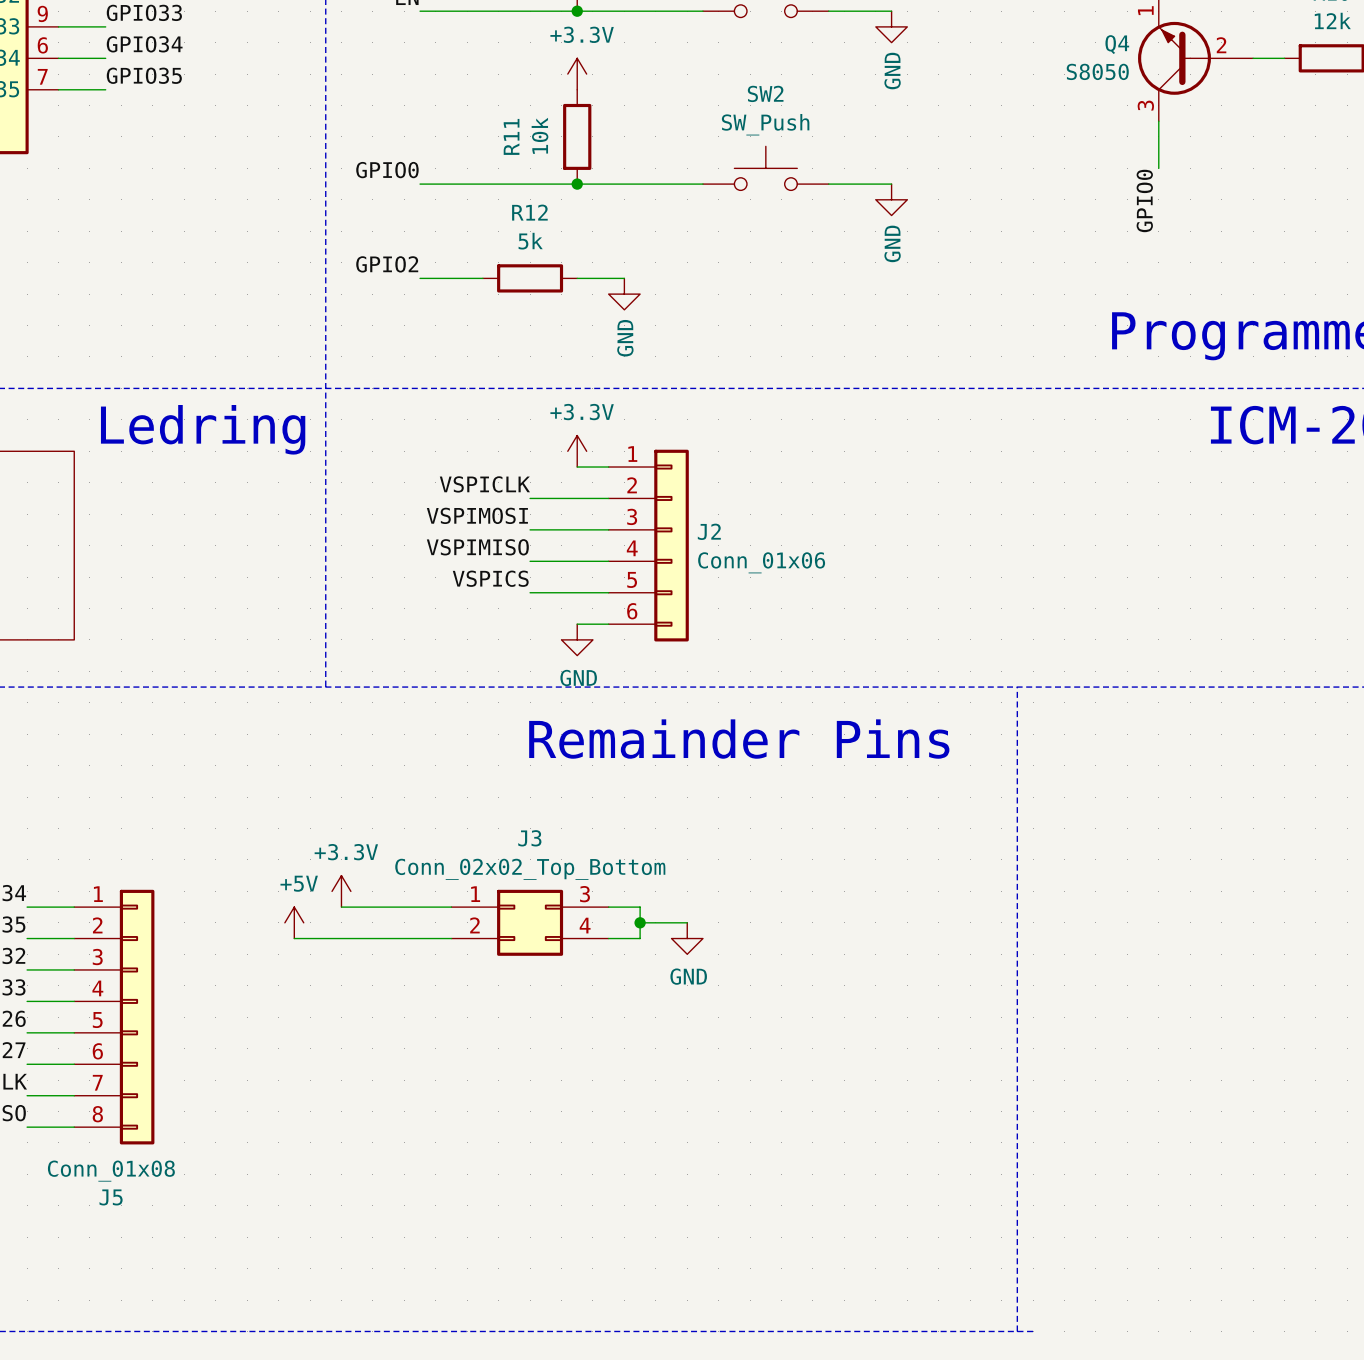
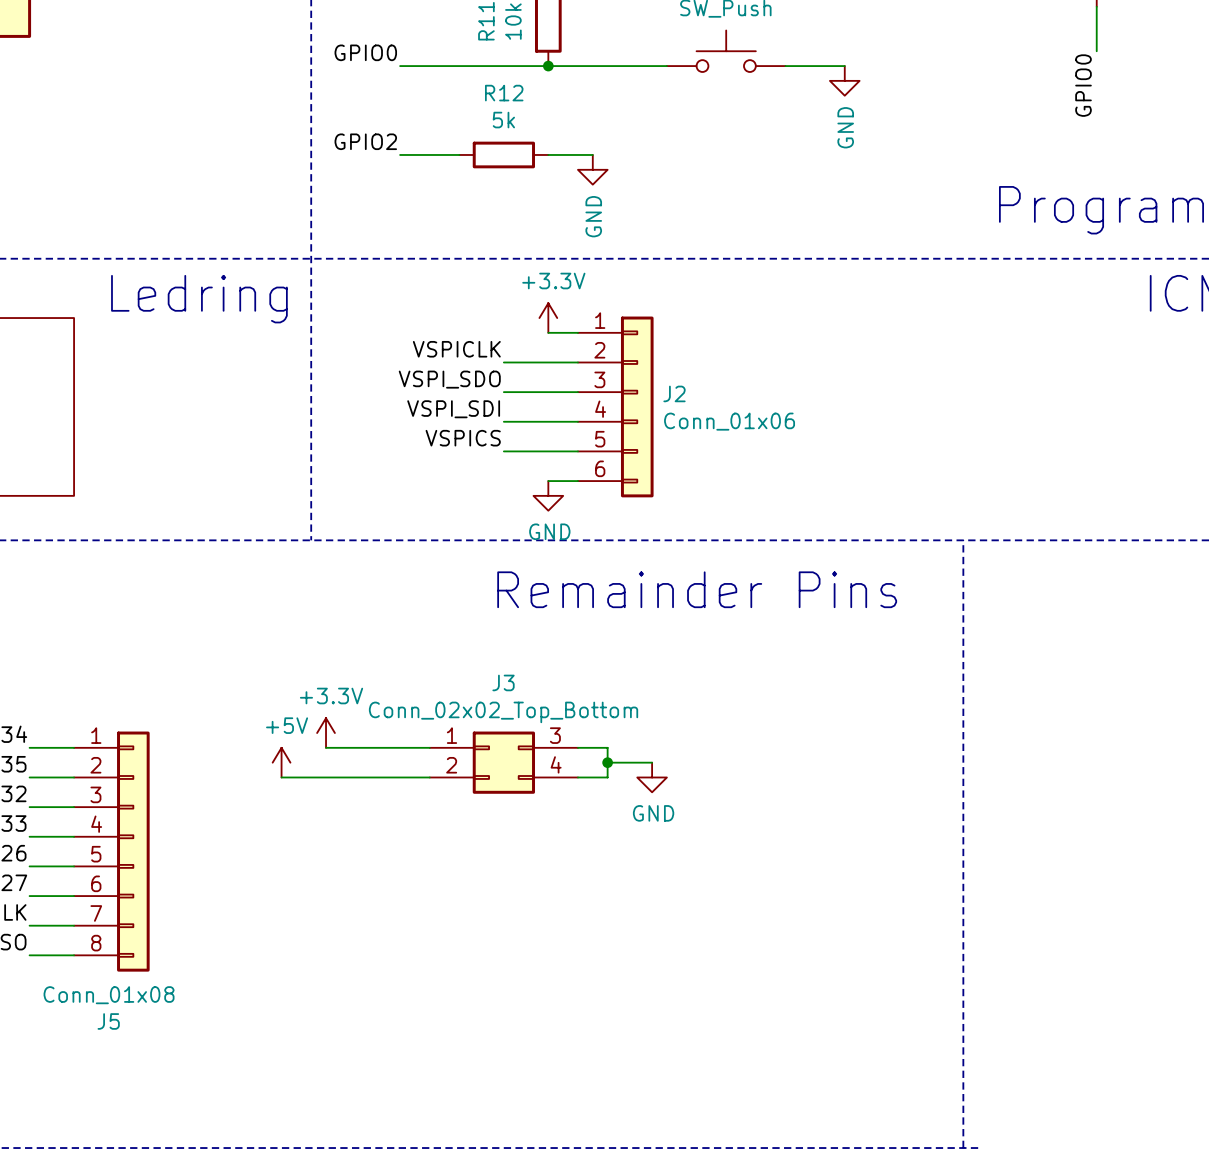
label: VSPIMOSI (477, 515) -> VSPI_SDO (449, 379)
label: VSPIMISO (477, 547) -> VSPI_SDI (453, 409)

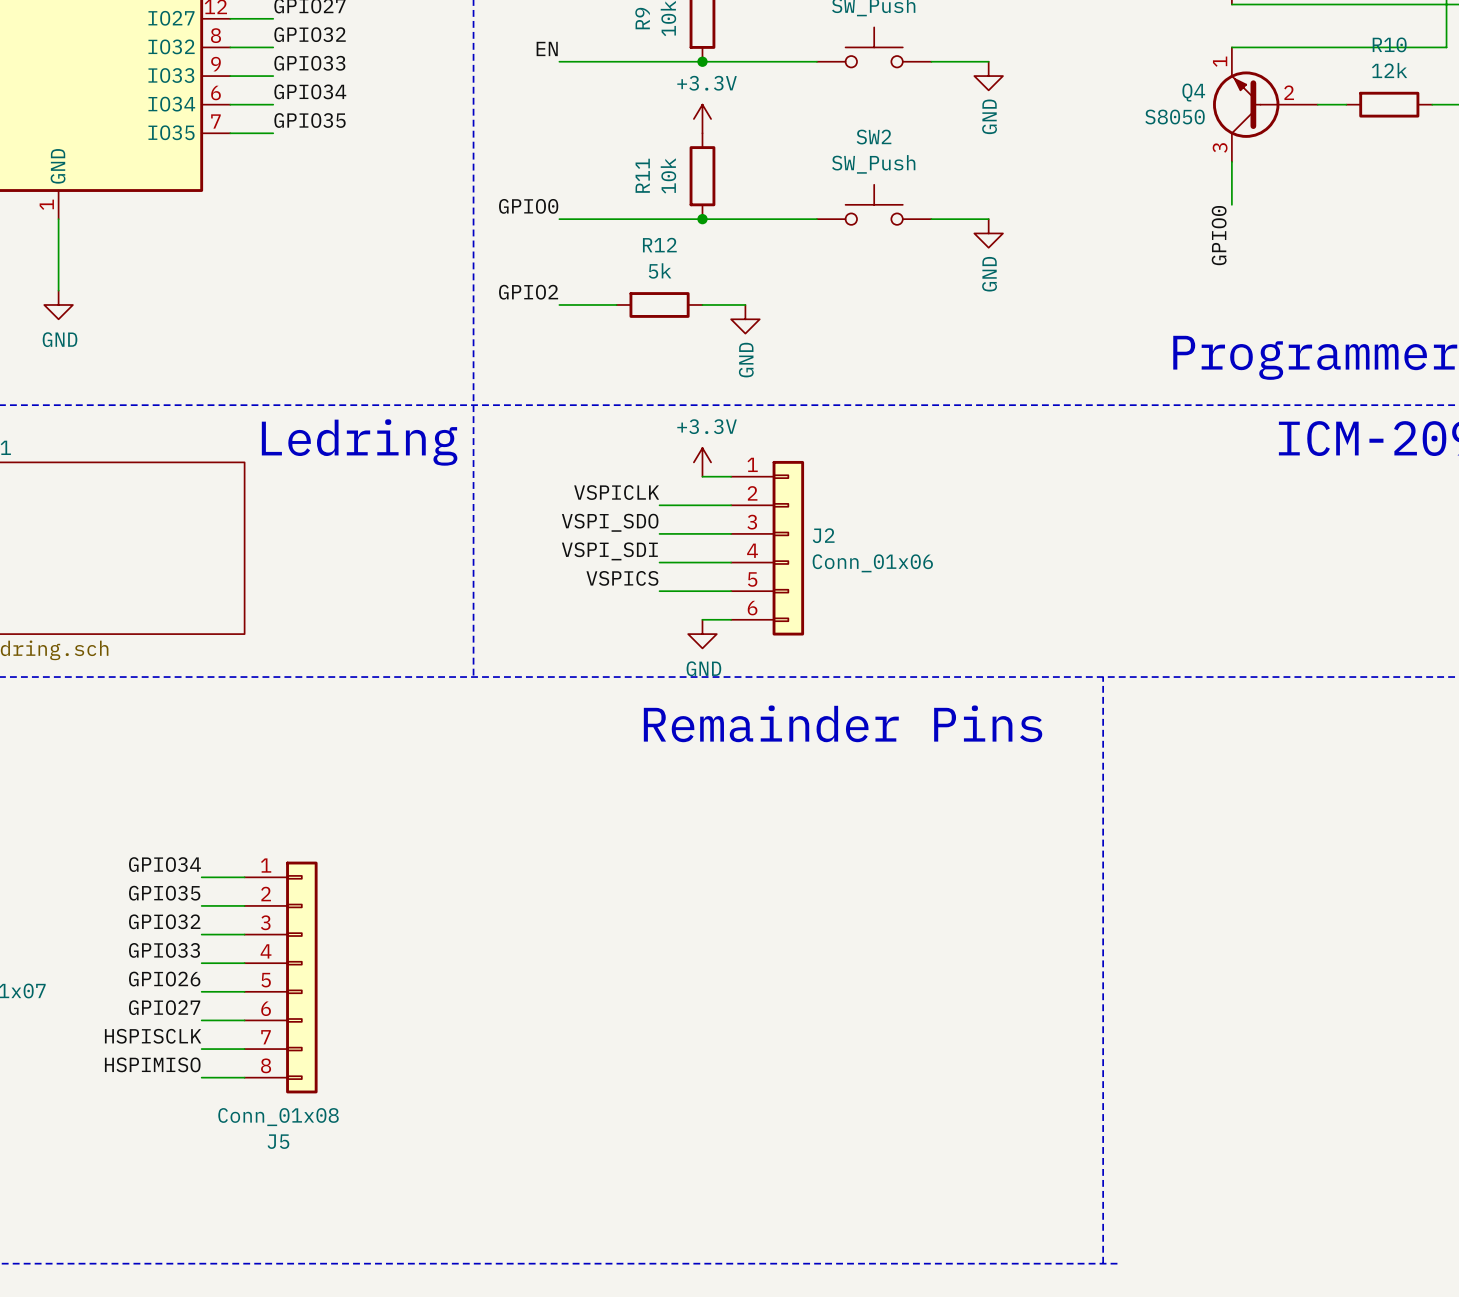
power symbol: +3.3V (326, 733) -> none
wire: (326, 747) (429, 747) -> none
wire: (577, 747) (607, 747) (607, 777) (577, 777) -> none
power symbol: +5V (281, 762) -> none
J3: Conn_02x02_Top_Bottom (503, 762) -> none
wire: (607, 762) (652, 762) -> none
junction: (607, 762) -> none
wire: (281, 777) (429, 777) -> none
power symbol: GND (652, 777) -> none

